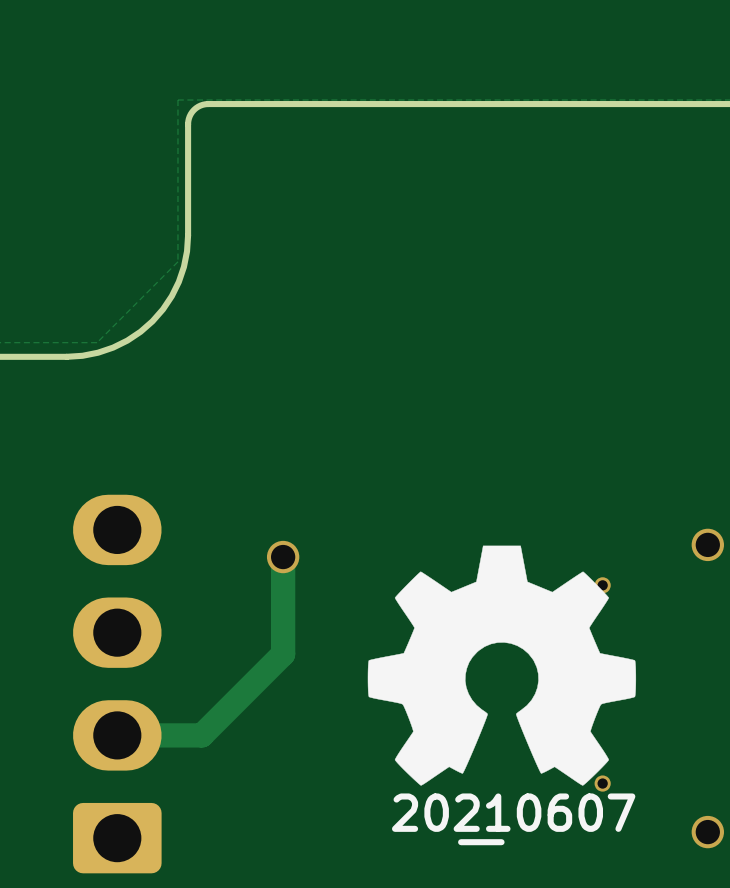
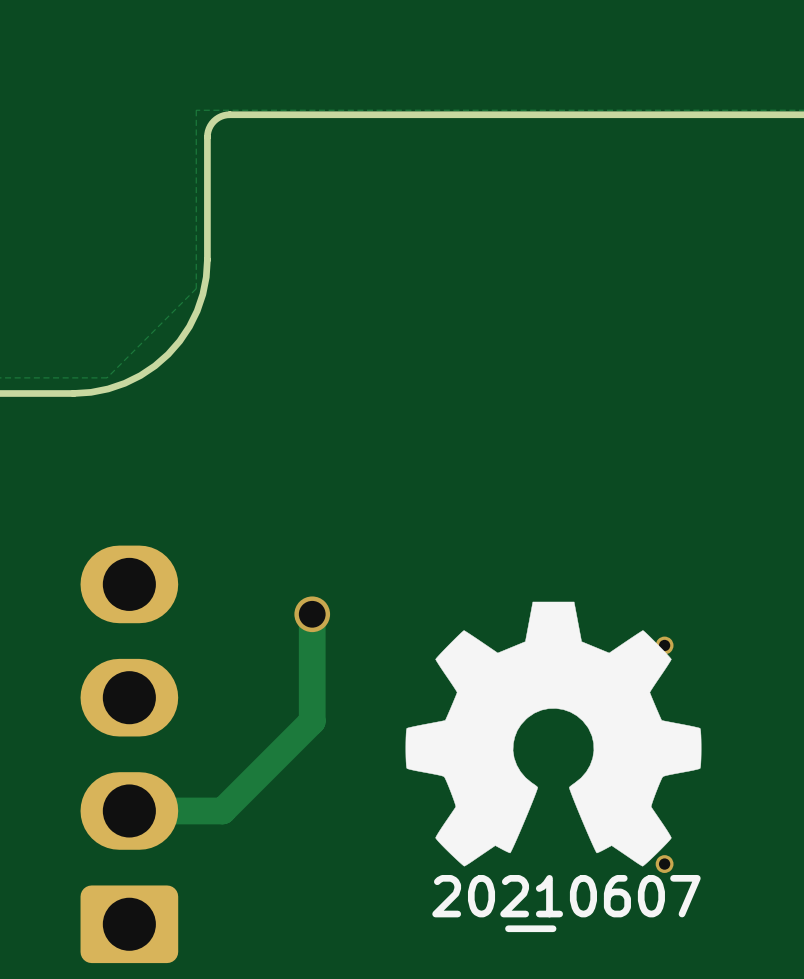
via: (707, 544) -> none
via: (707, 832) -> none

